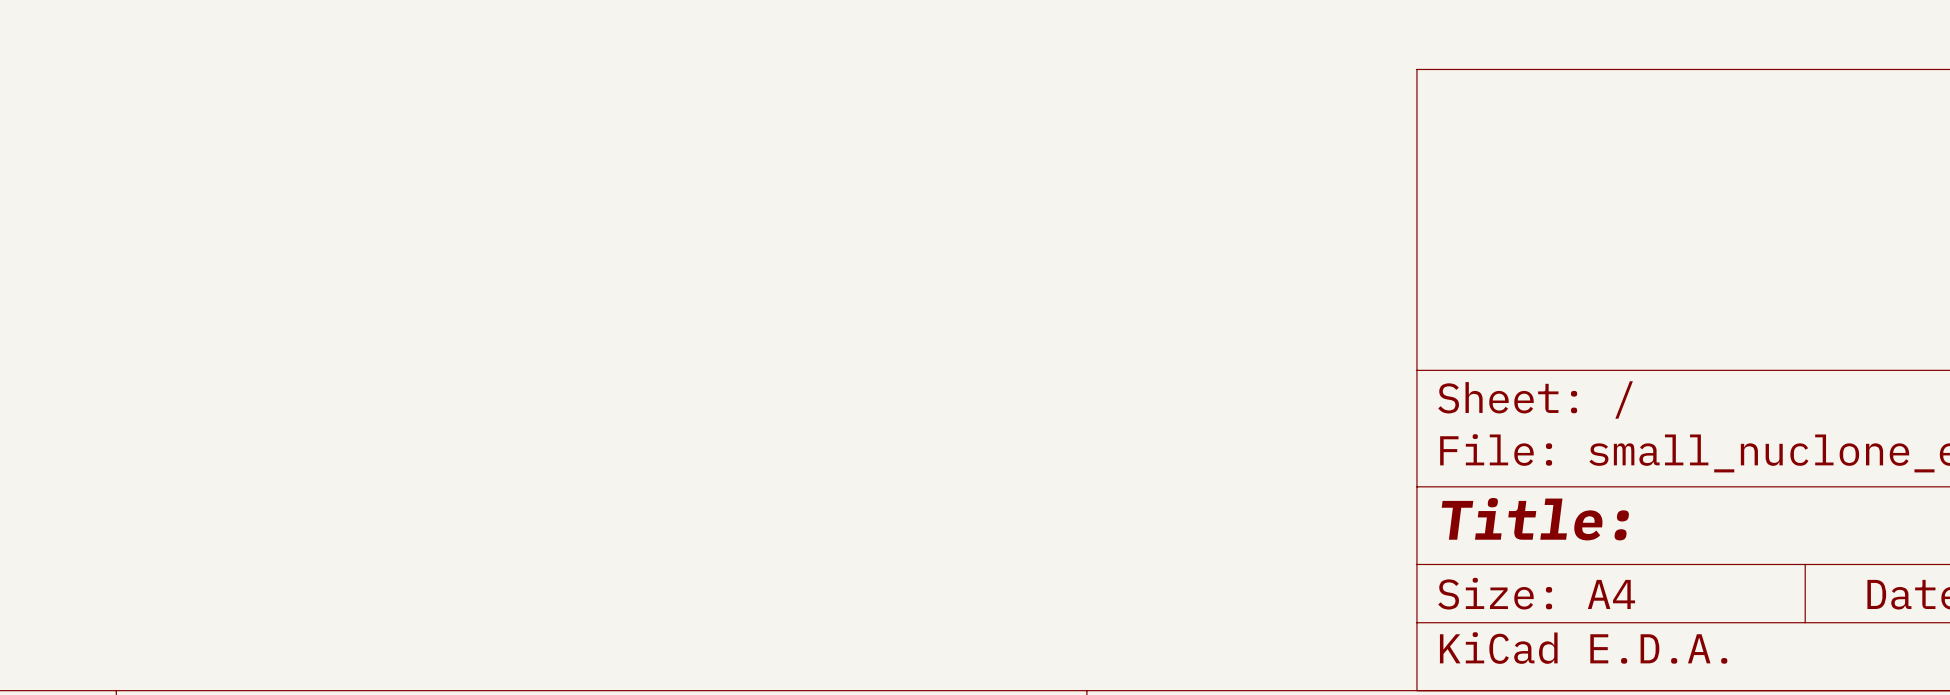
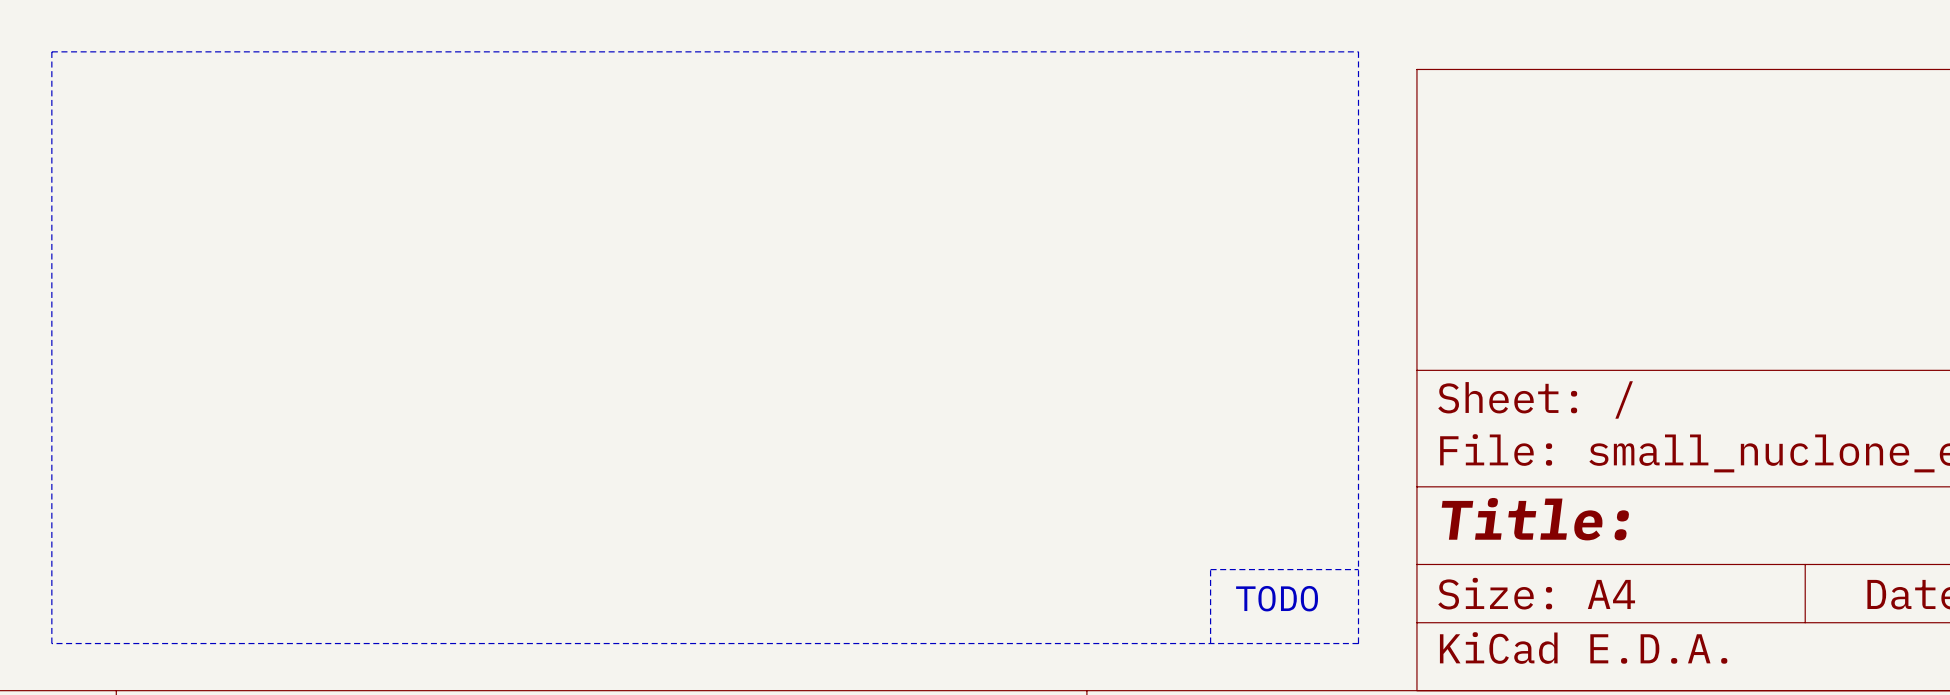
line: none -> (51, 51) (51, 643) (1358, 643) (1358, 51) (51, 51)
line: none -> (1358, 569) (1210, 569) (1210, 643)
text: none -> TODO (1277, 598)

